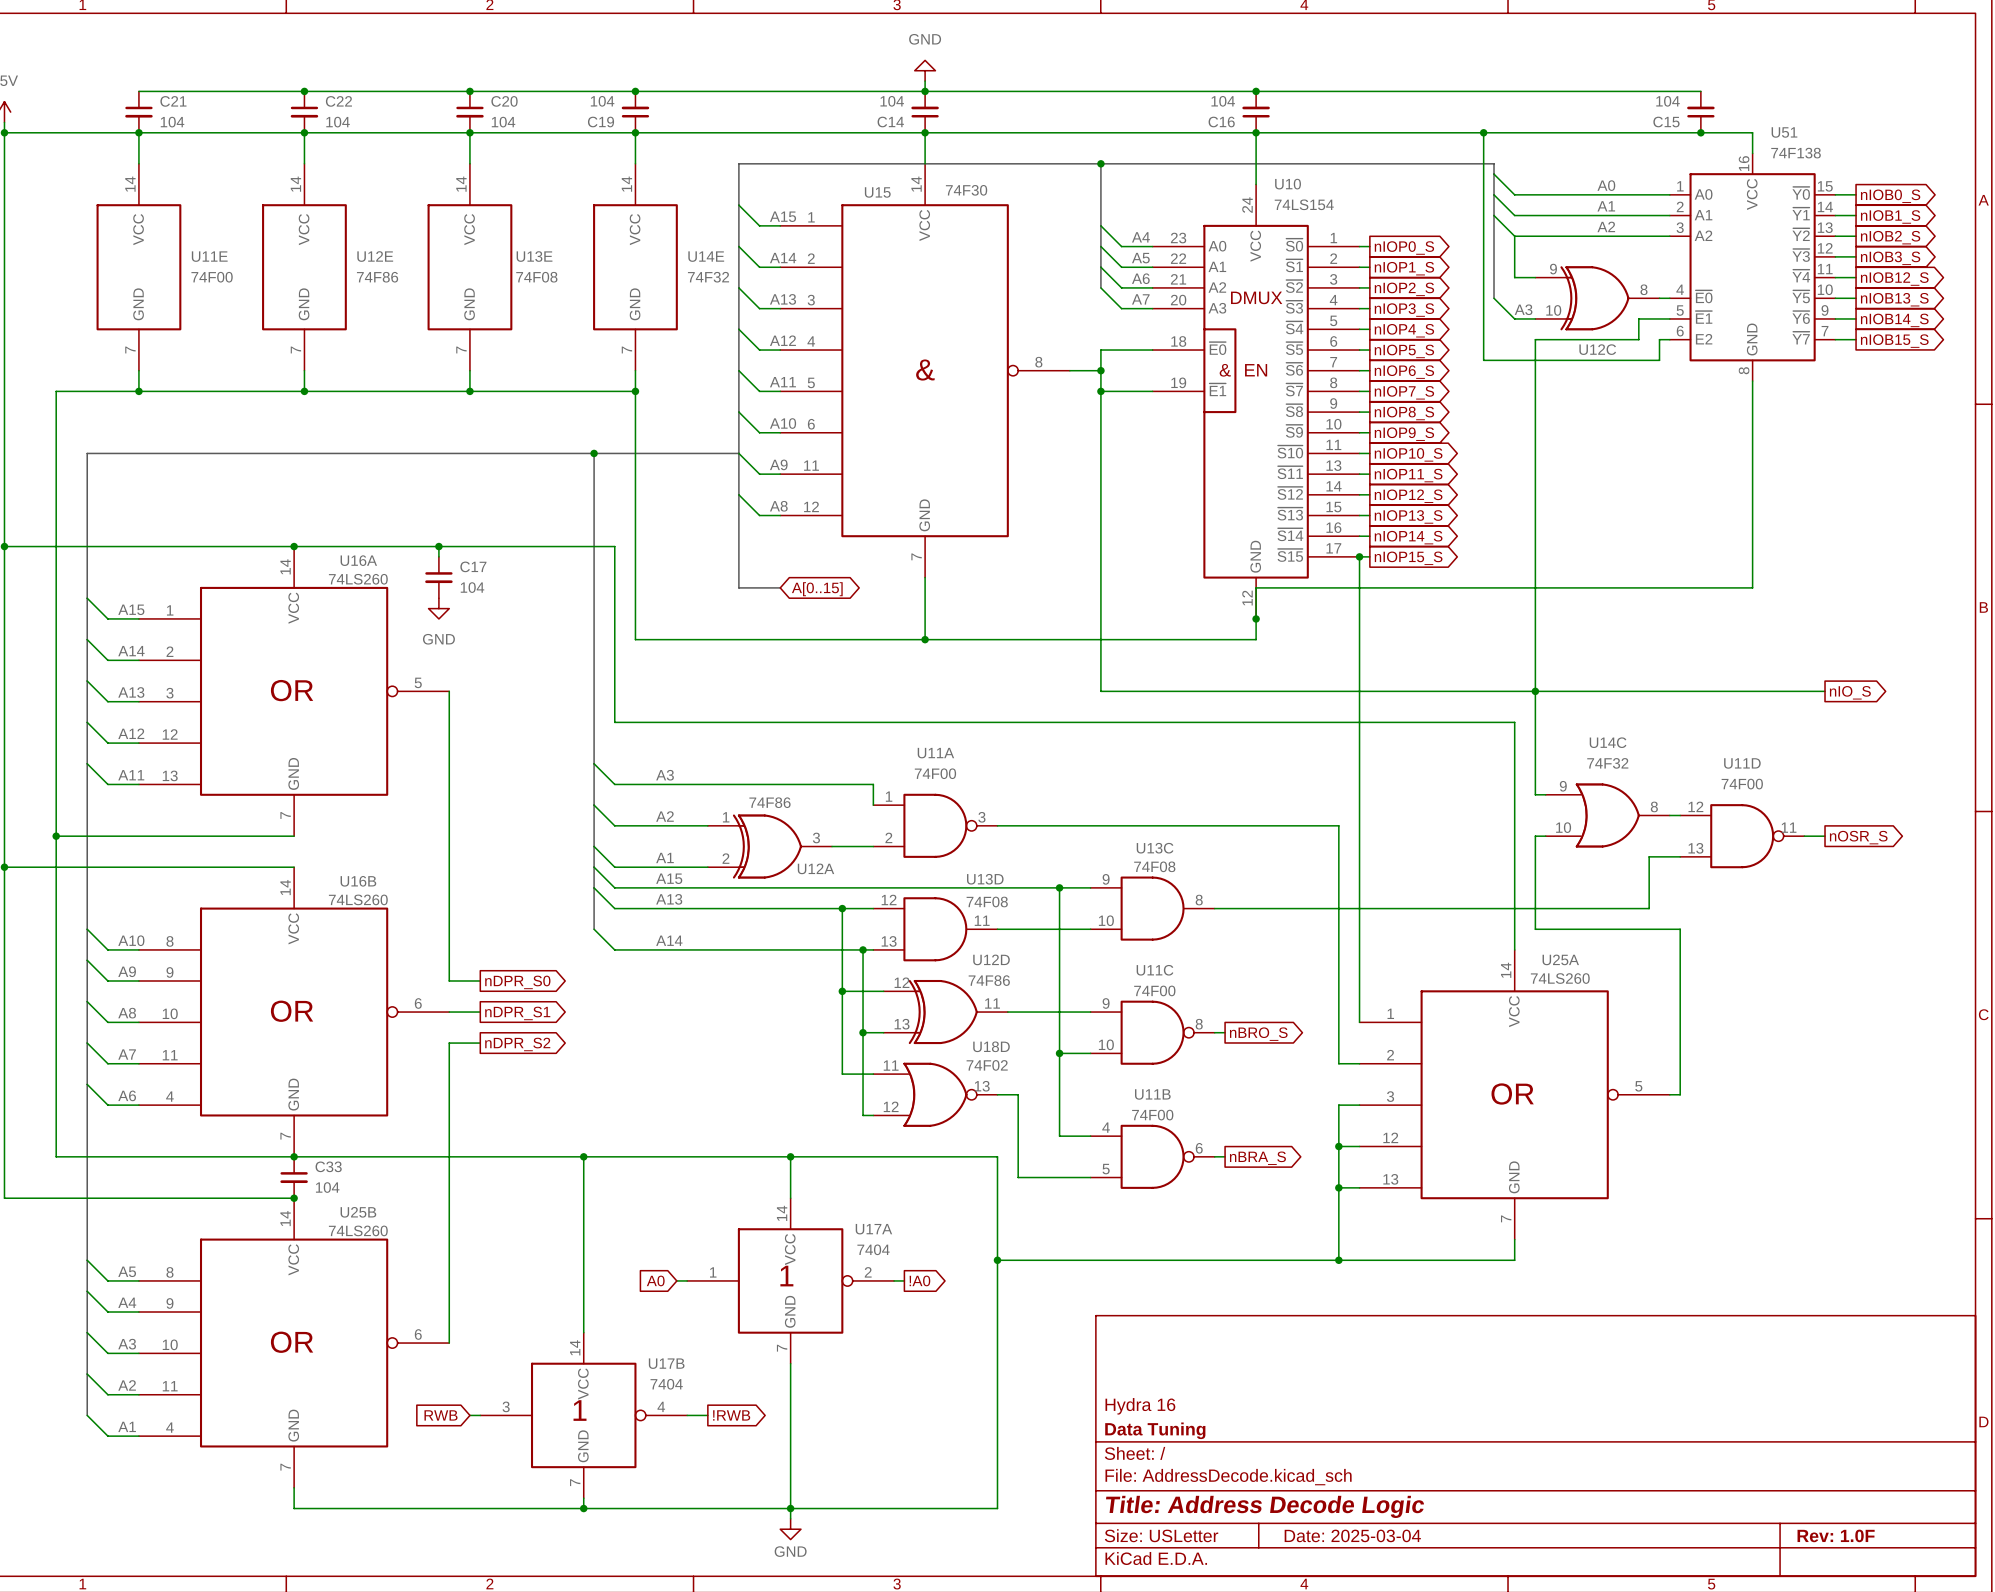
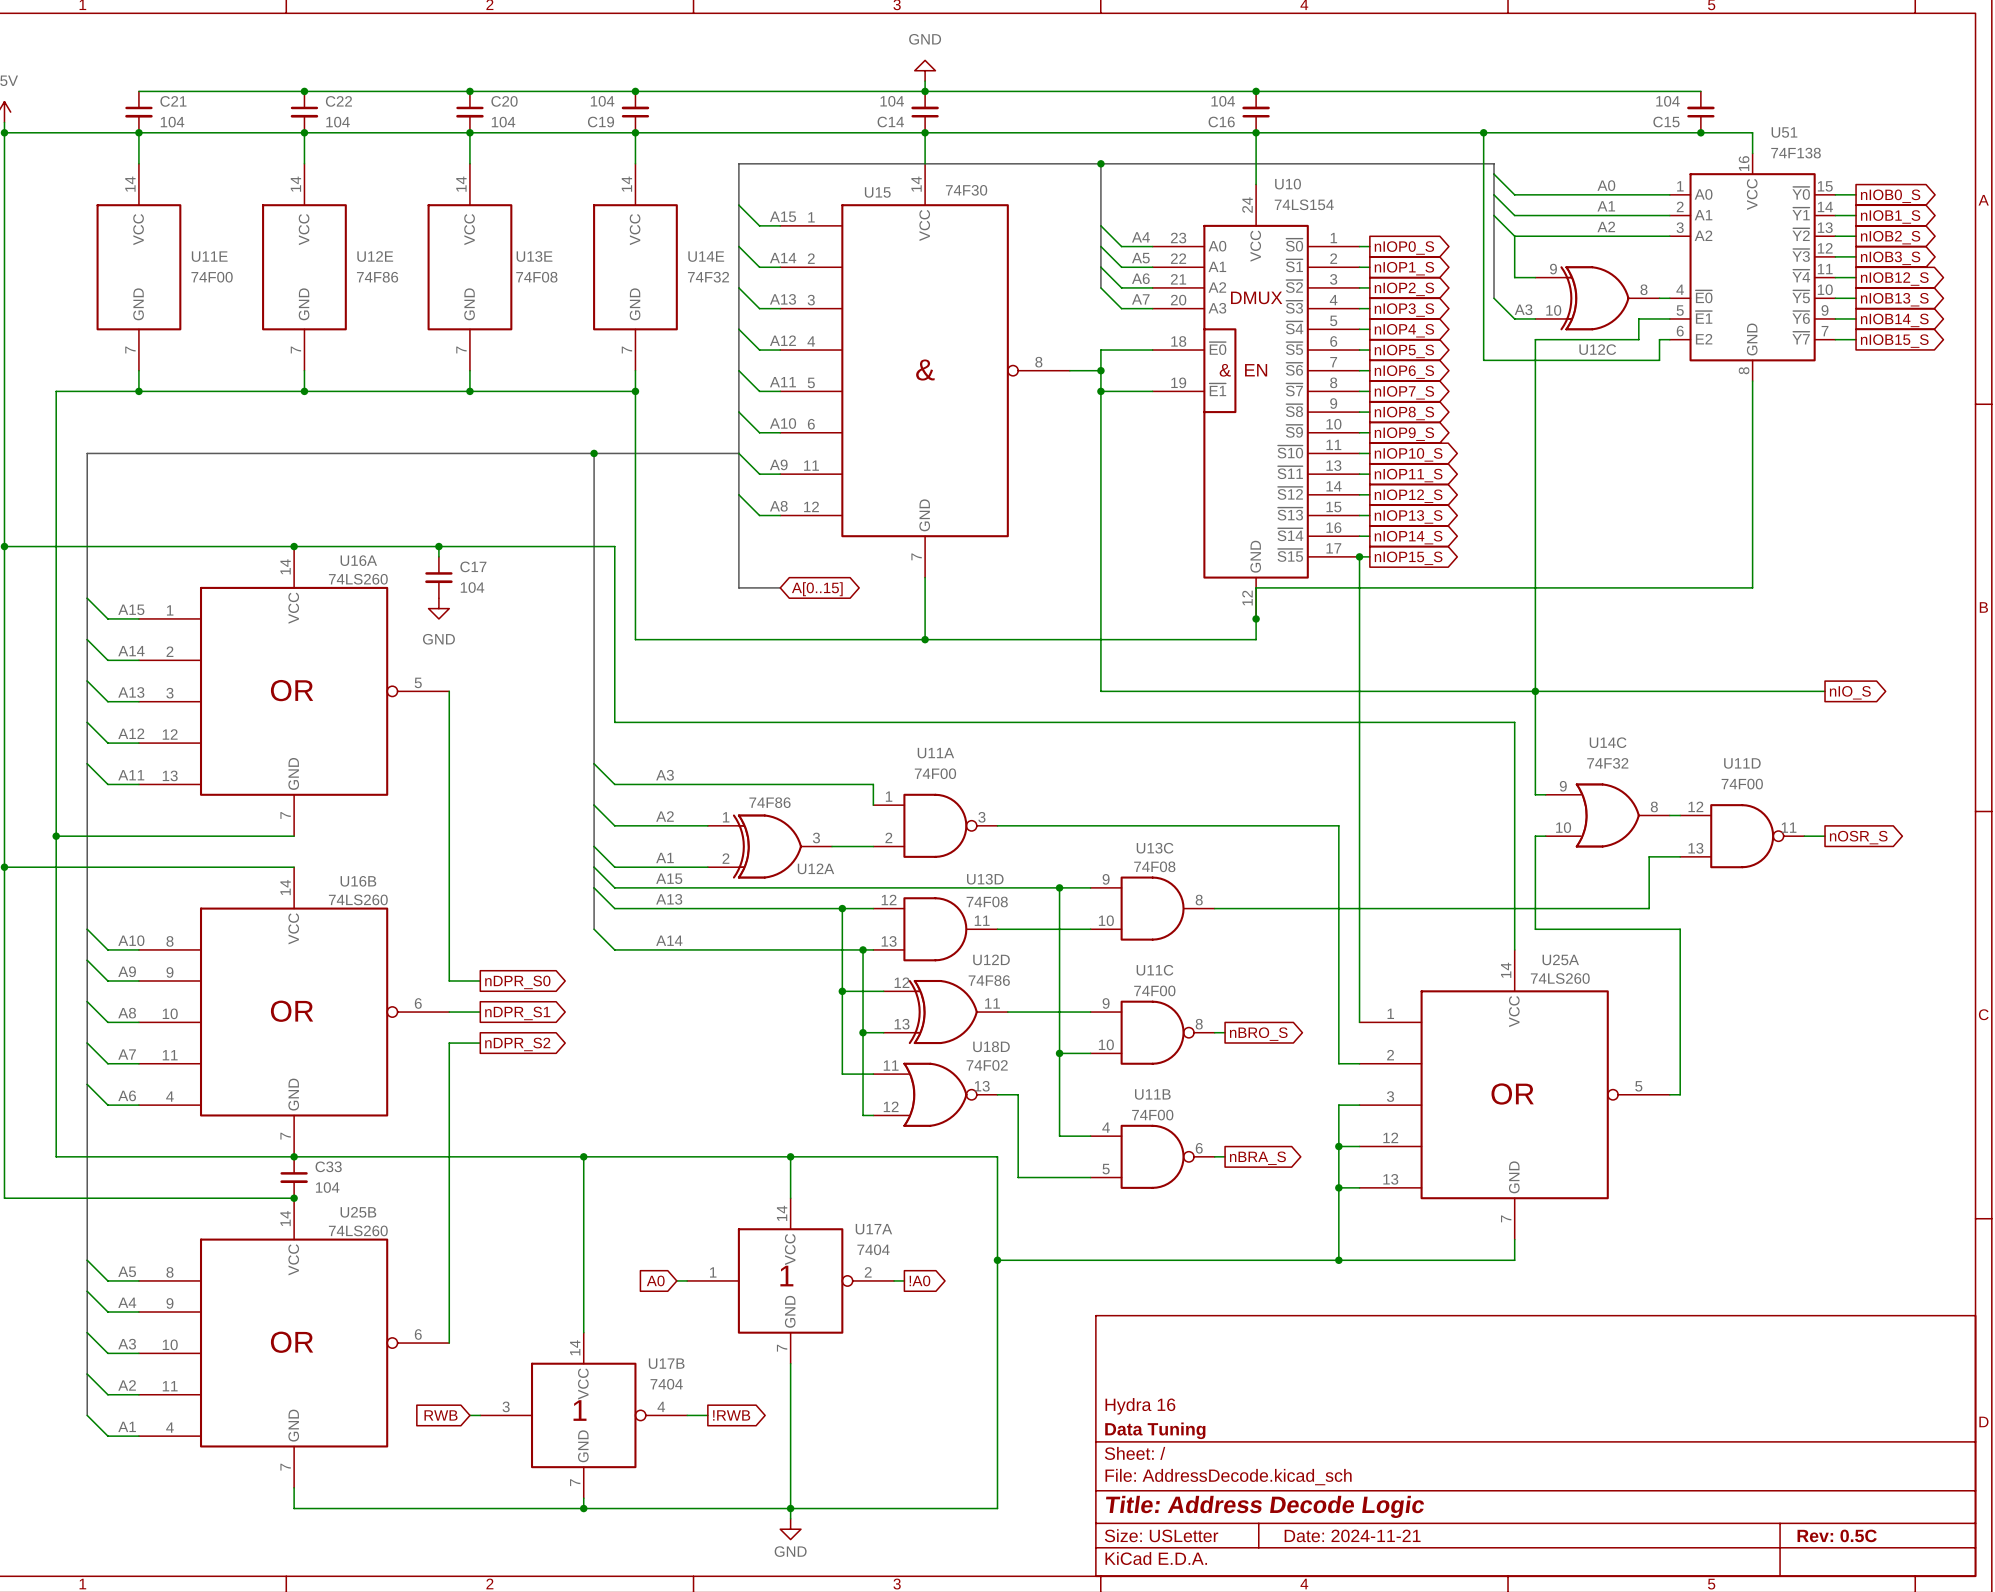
title block: Date: 2025-03-04 (1352, 1535) -> Date: 2024-11-21 (1352, 1535)
title block: Rev: 1.0F (1836, 1535) -> Rev: 0.5C (1837, 1535)

